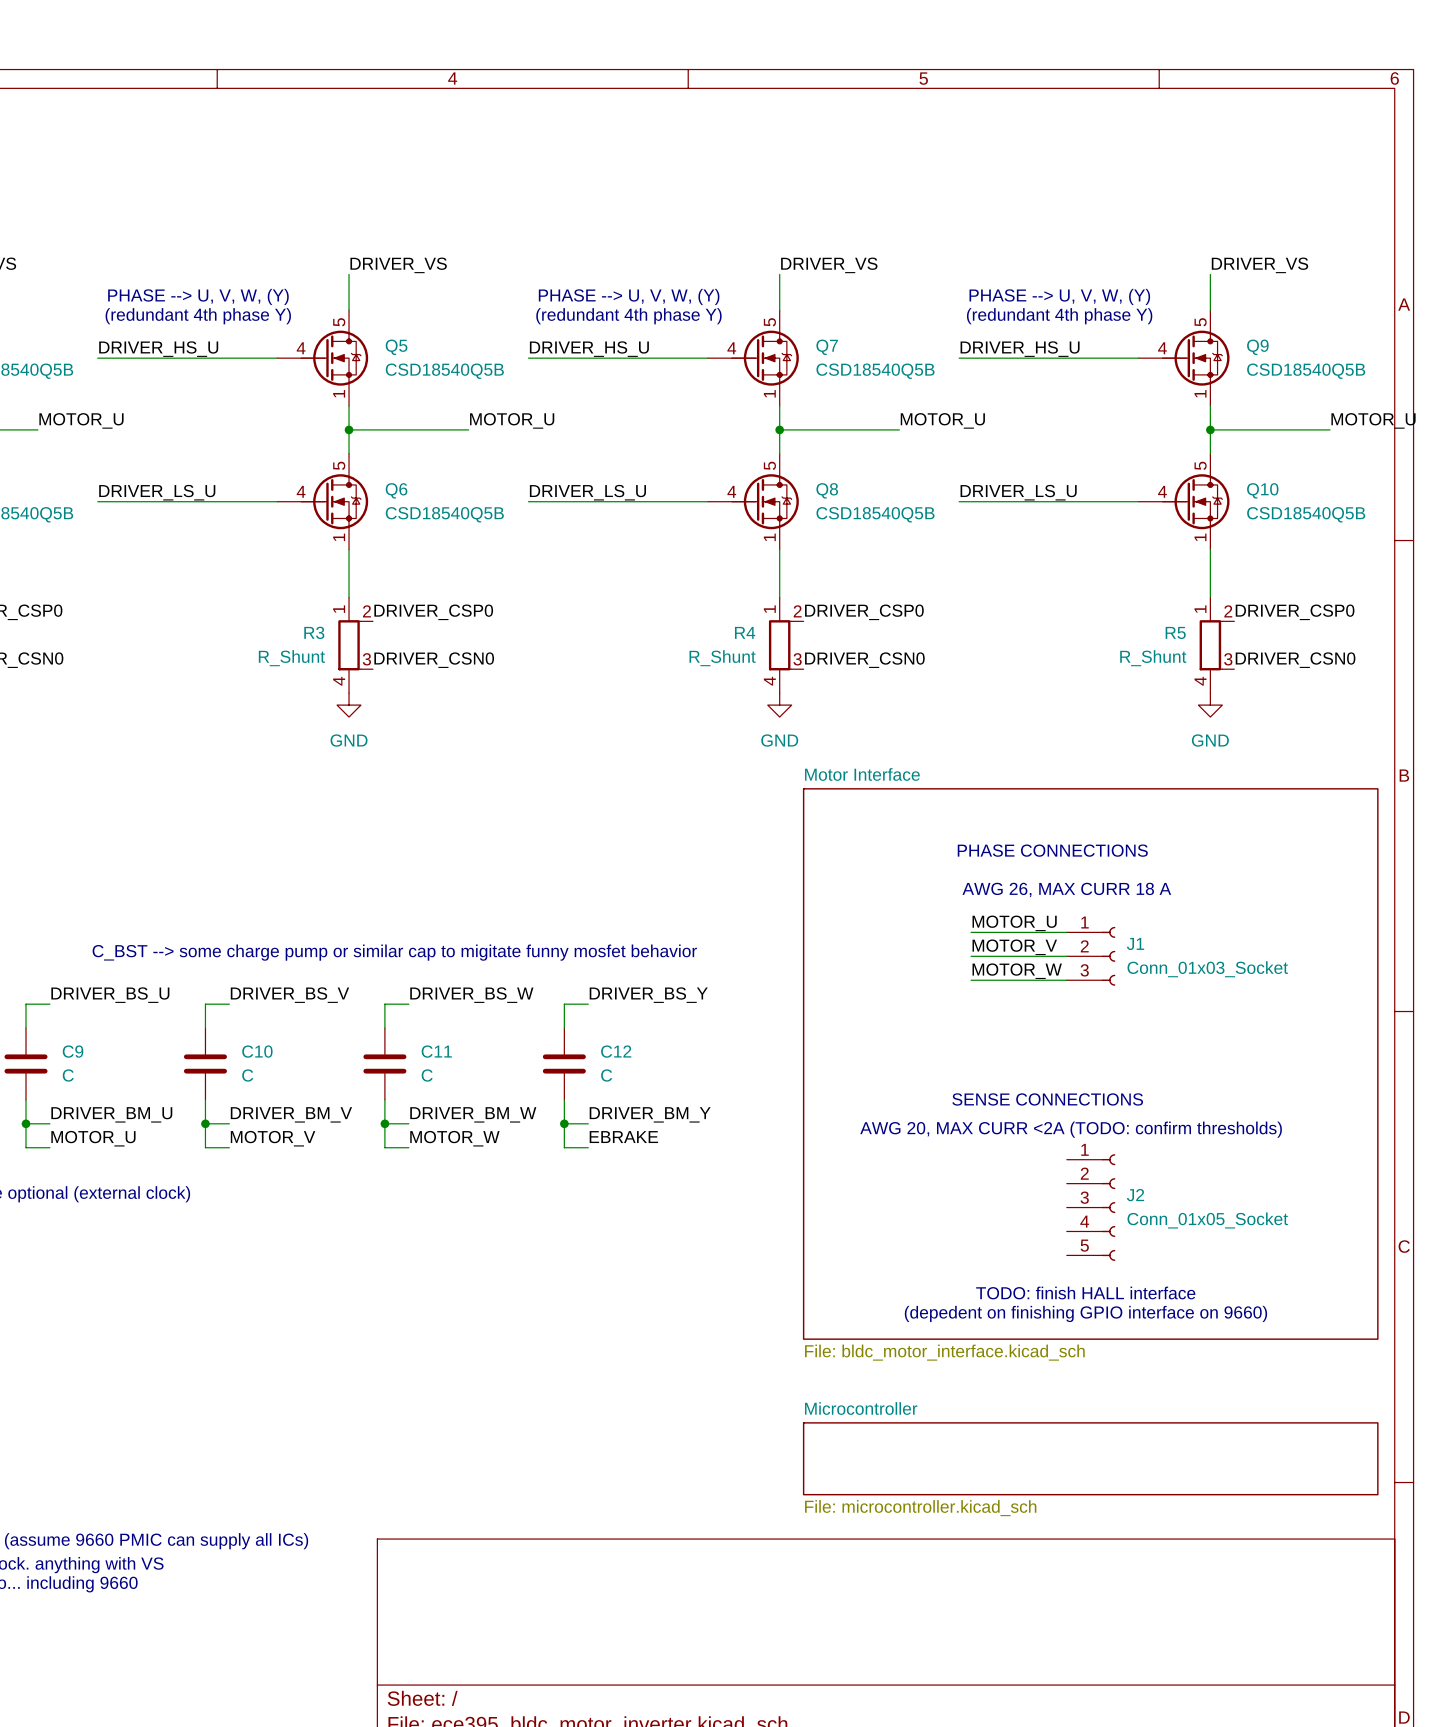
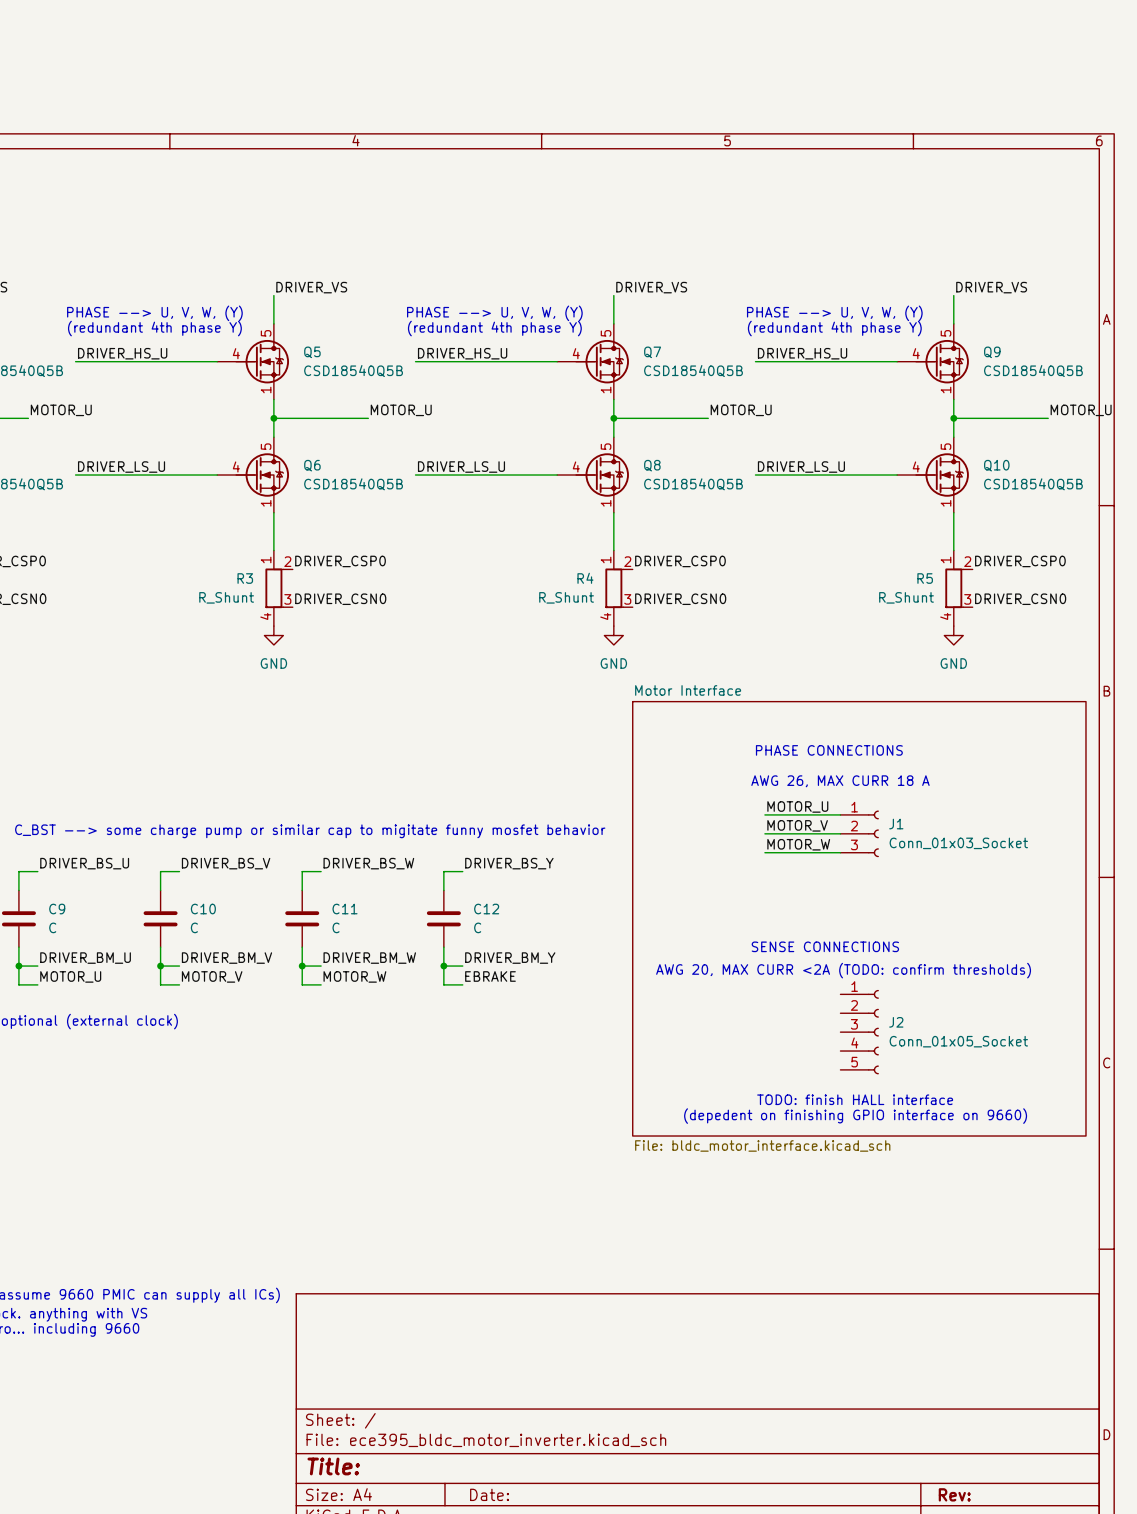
sheet Microcontroller: File: microcontroller.kicad_sch (1090, 1458) -> none

